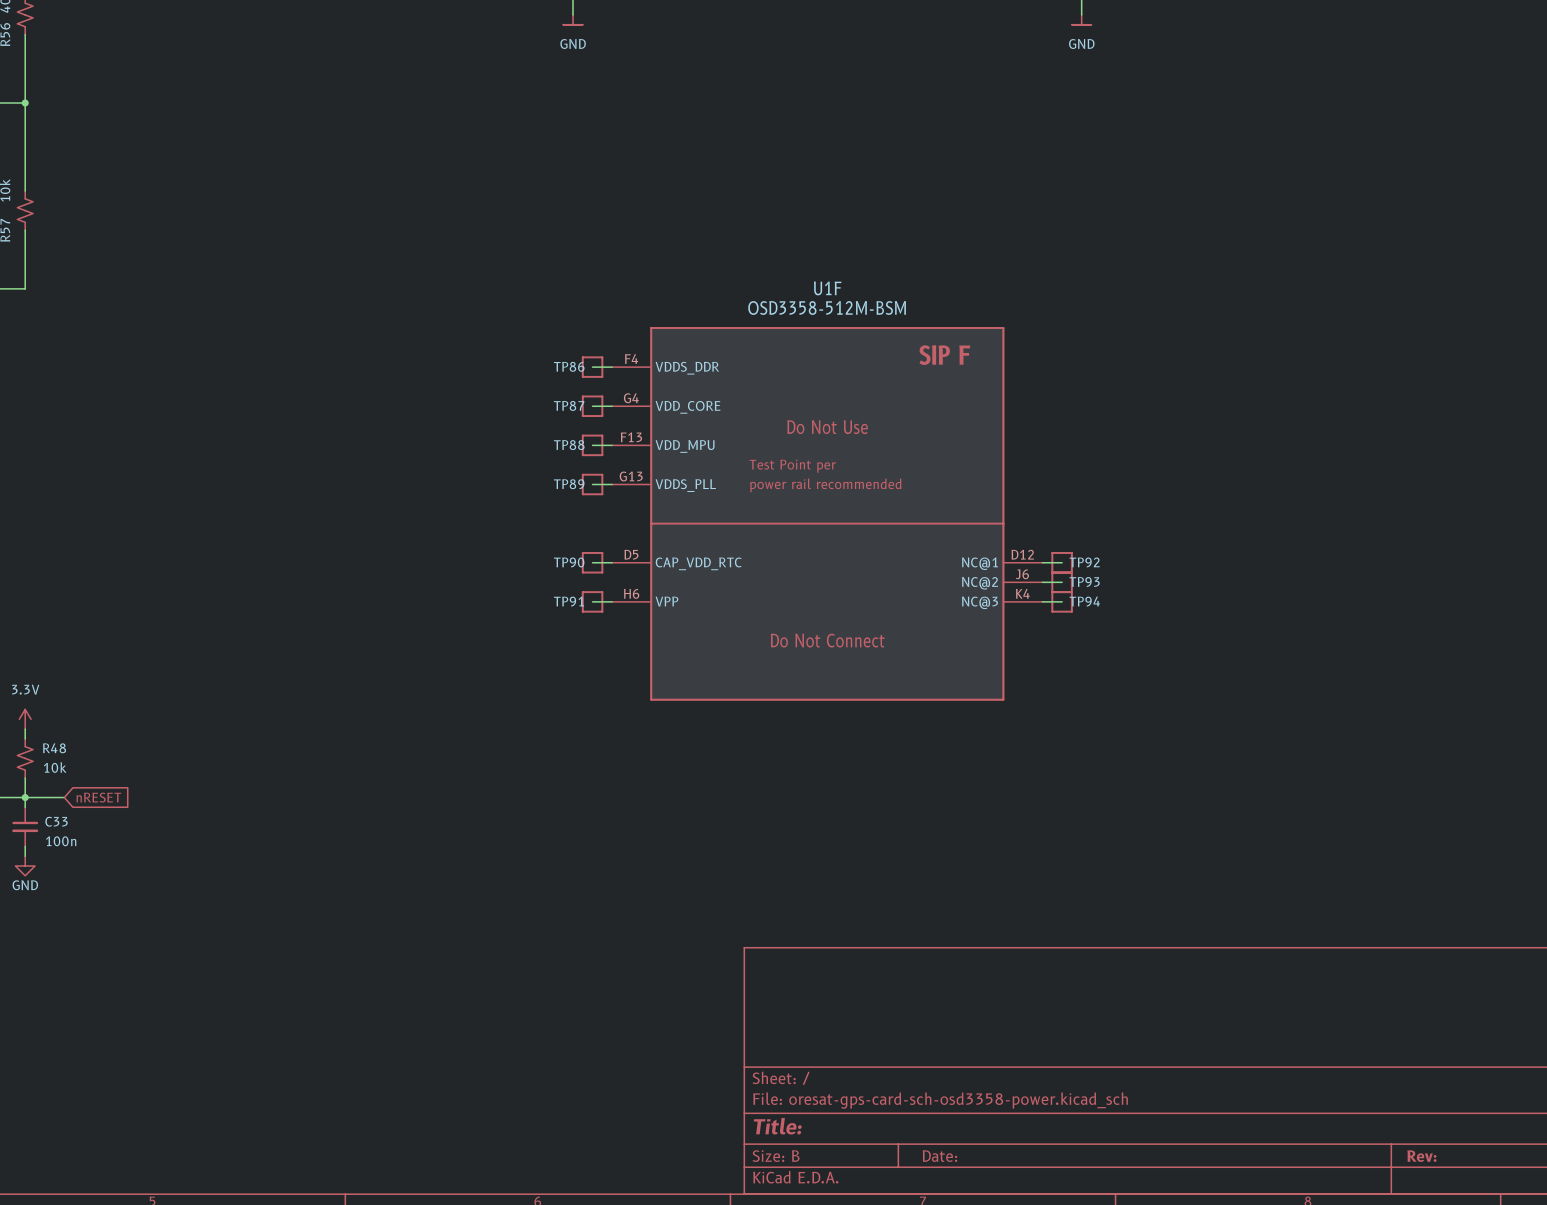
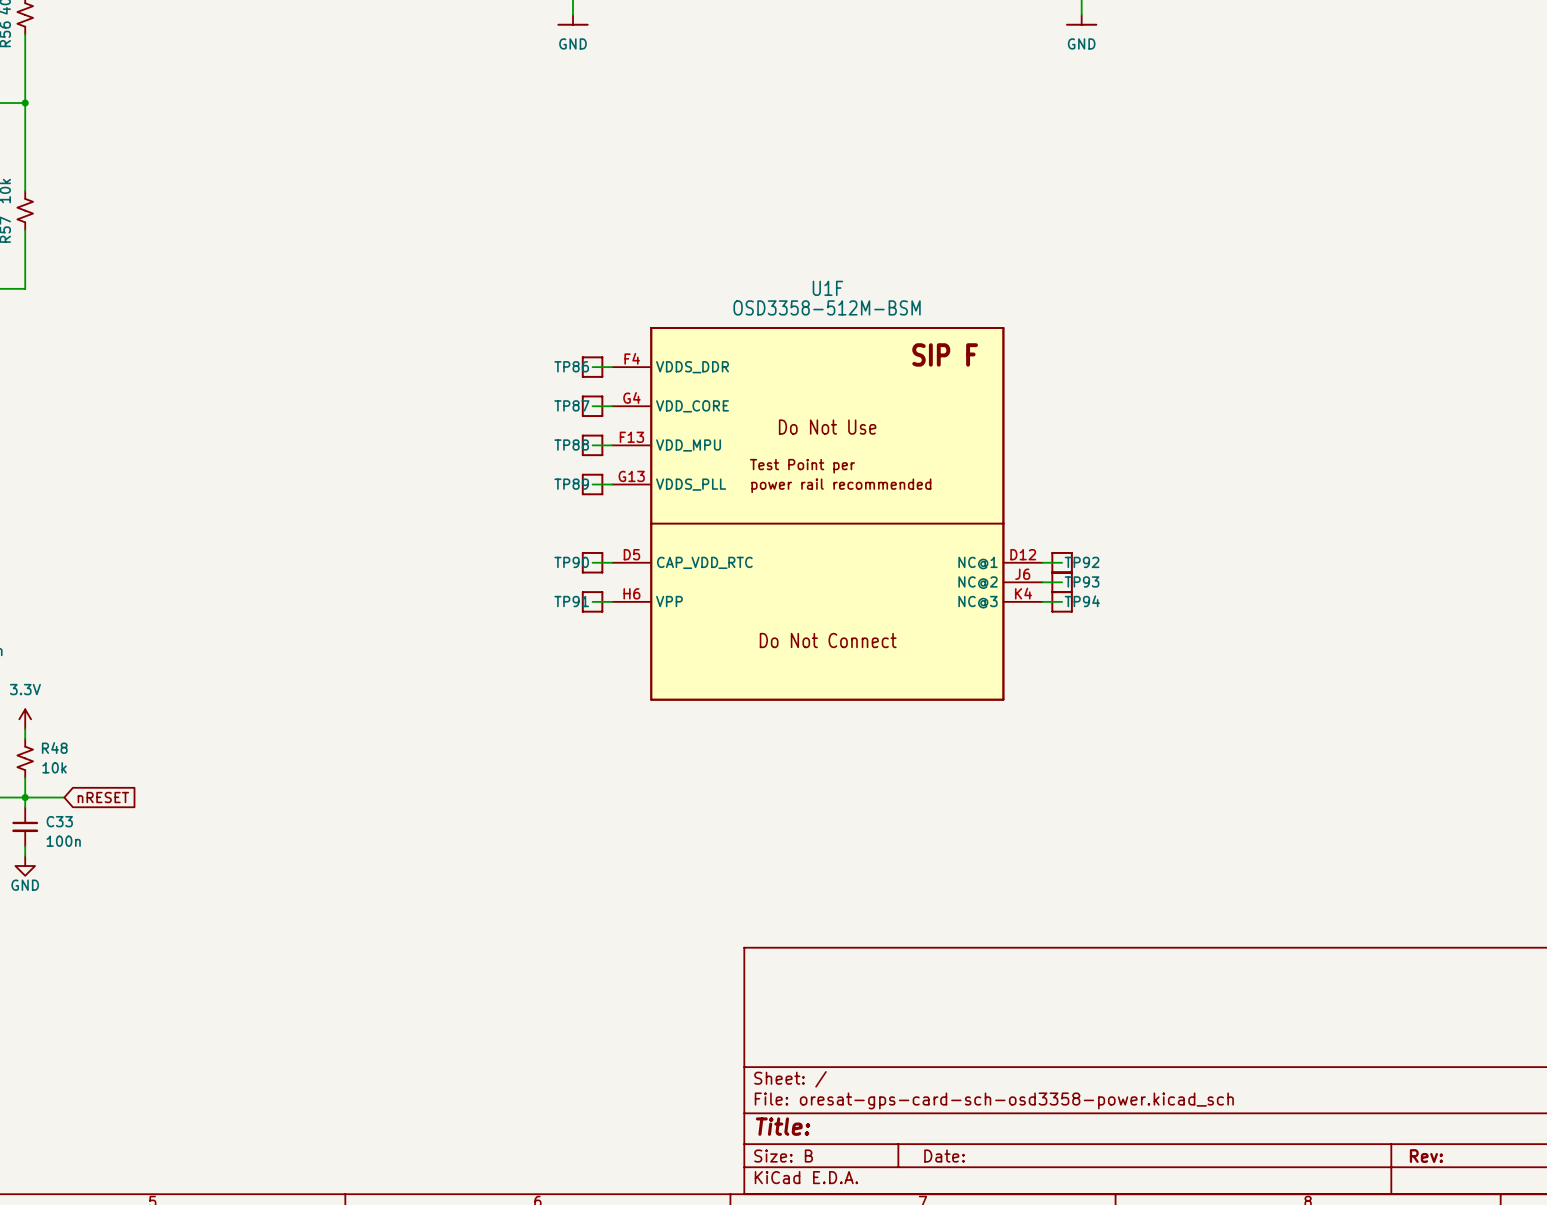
power symbol shape: [563, 14, 583, 25] -> [557, 14, 589, 26]
power symbol shape: [1071, 14, 1092, 25] -> [1066, 14, 1098, 26]

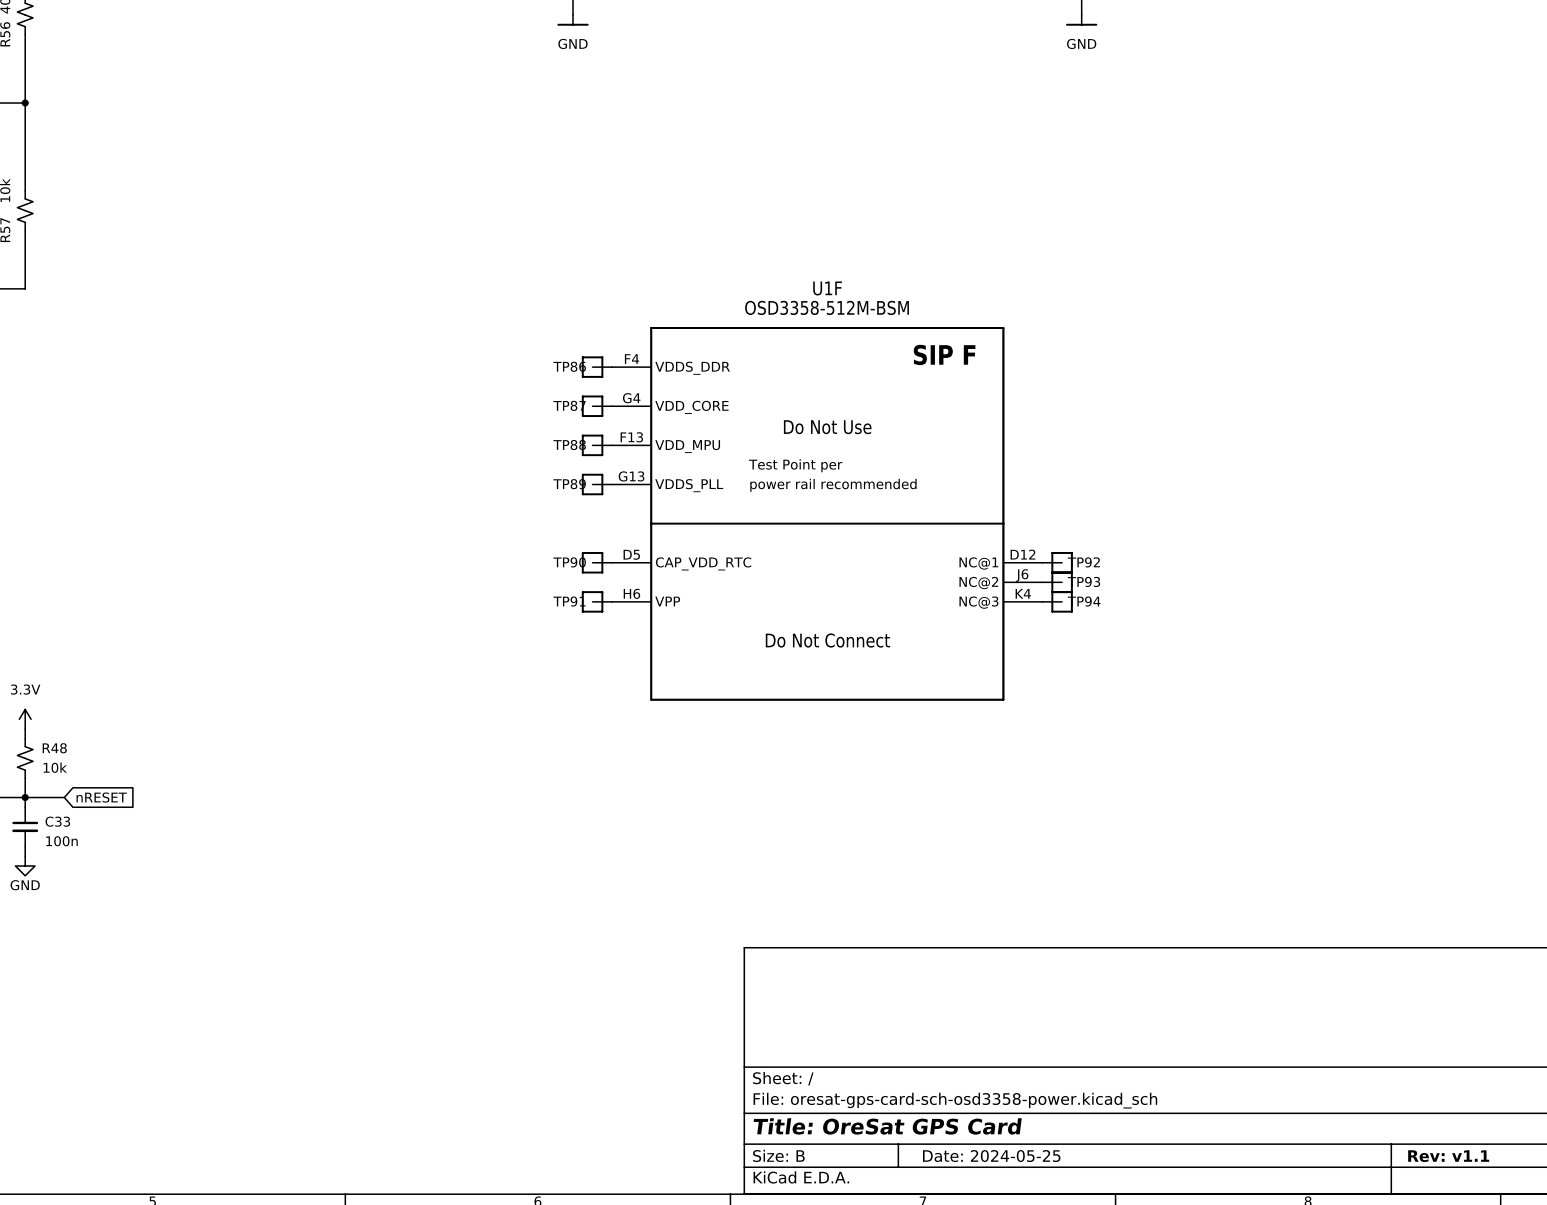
title block: Title: (783, 1126) -> Title: OreSat GPS Card (887, 1126)
title block: Date: (944, 1156) -> Date: 2024-05-25 (991, 1156)
title block: Rev: (1426, 1156) -> Rev: v1.1 (1448, 1156)

